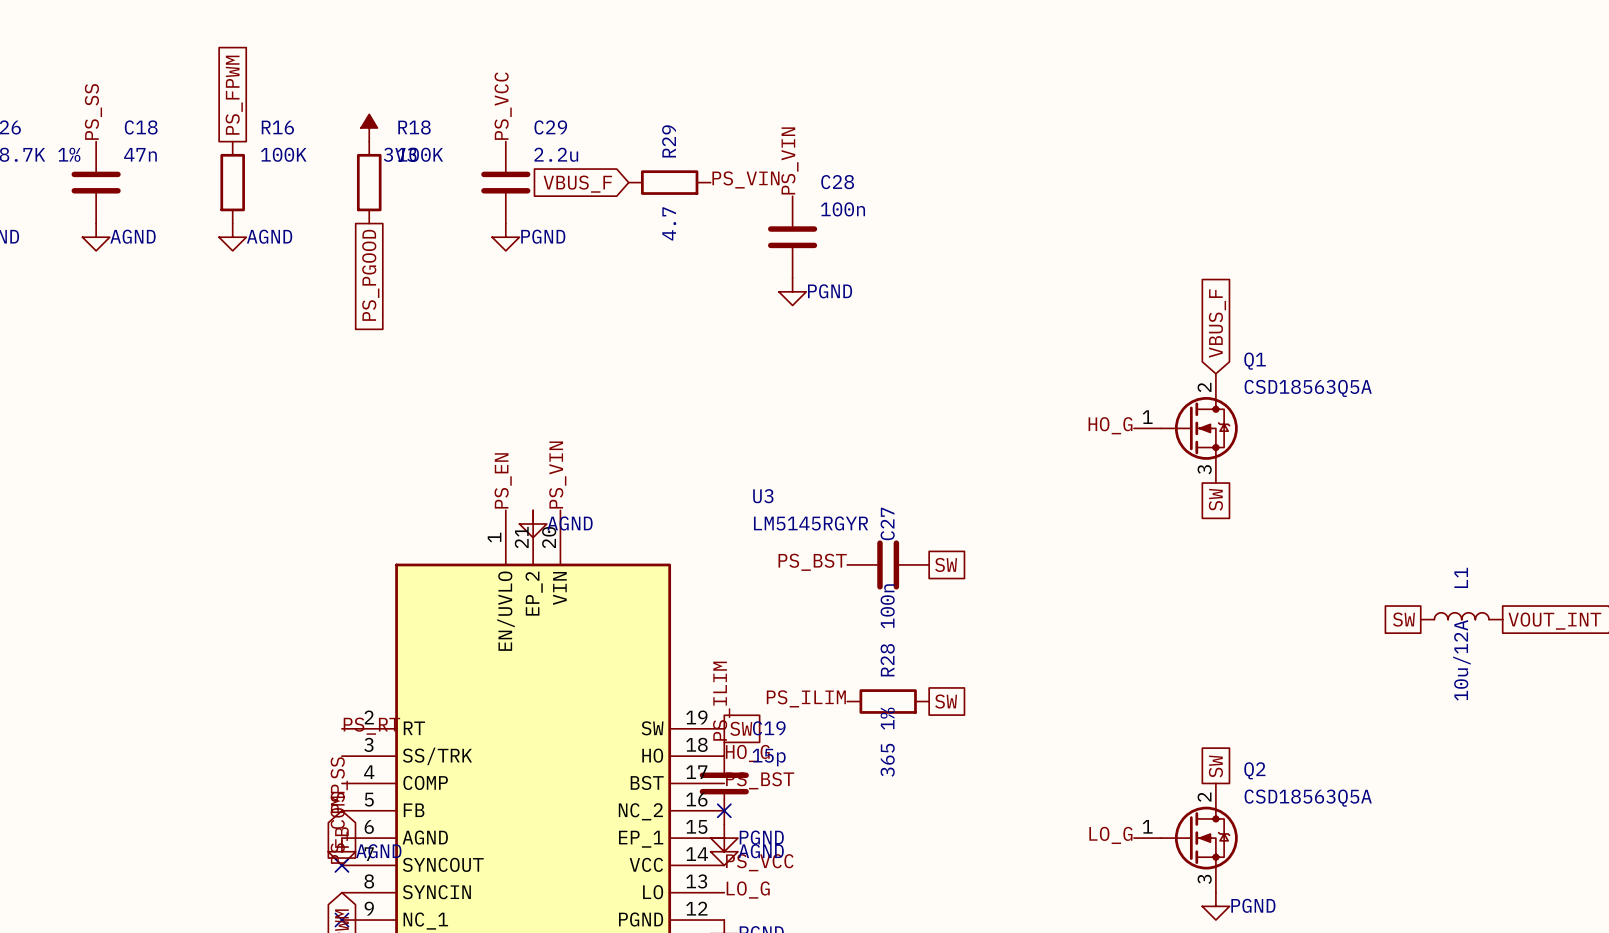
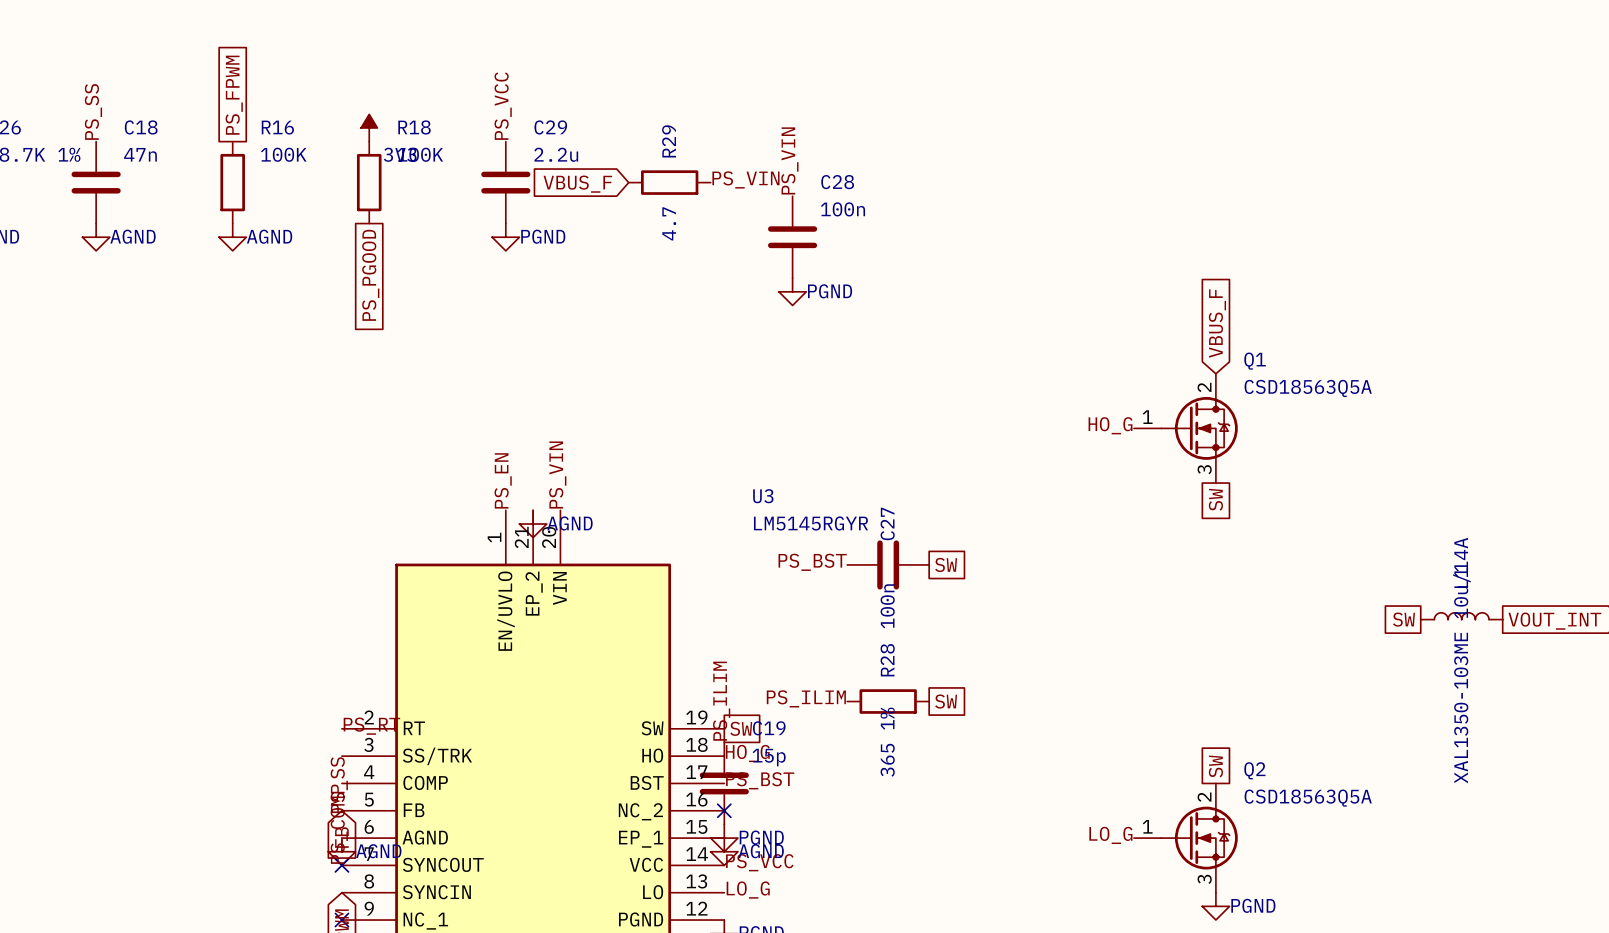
L1 value: 10u/12A (1461, 660) -> XAL1350-103ME 10u/14A (1461, 660)

